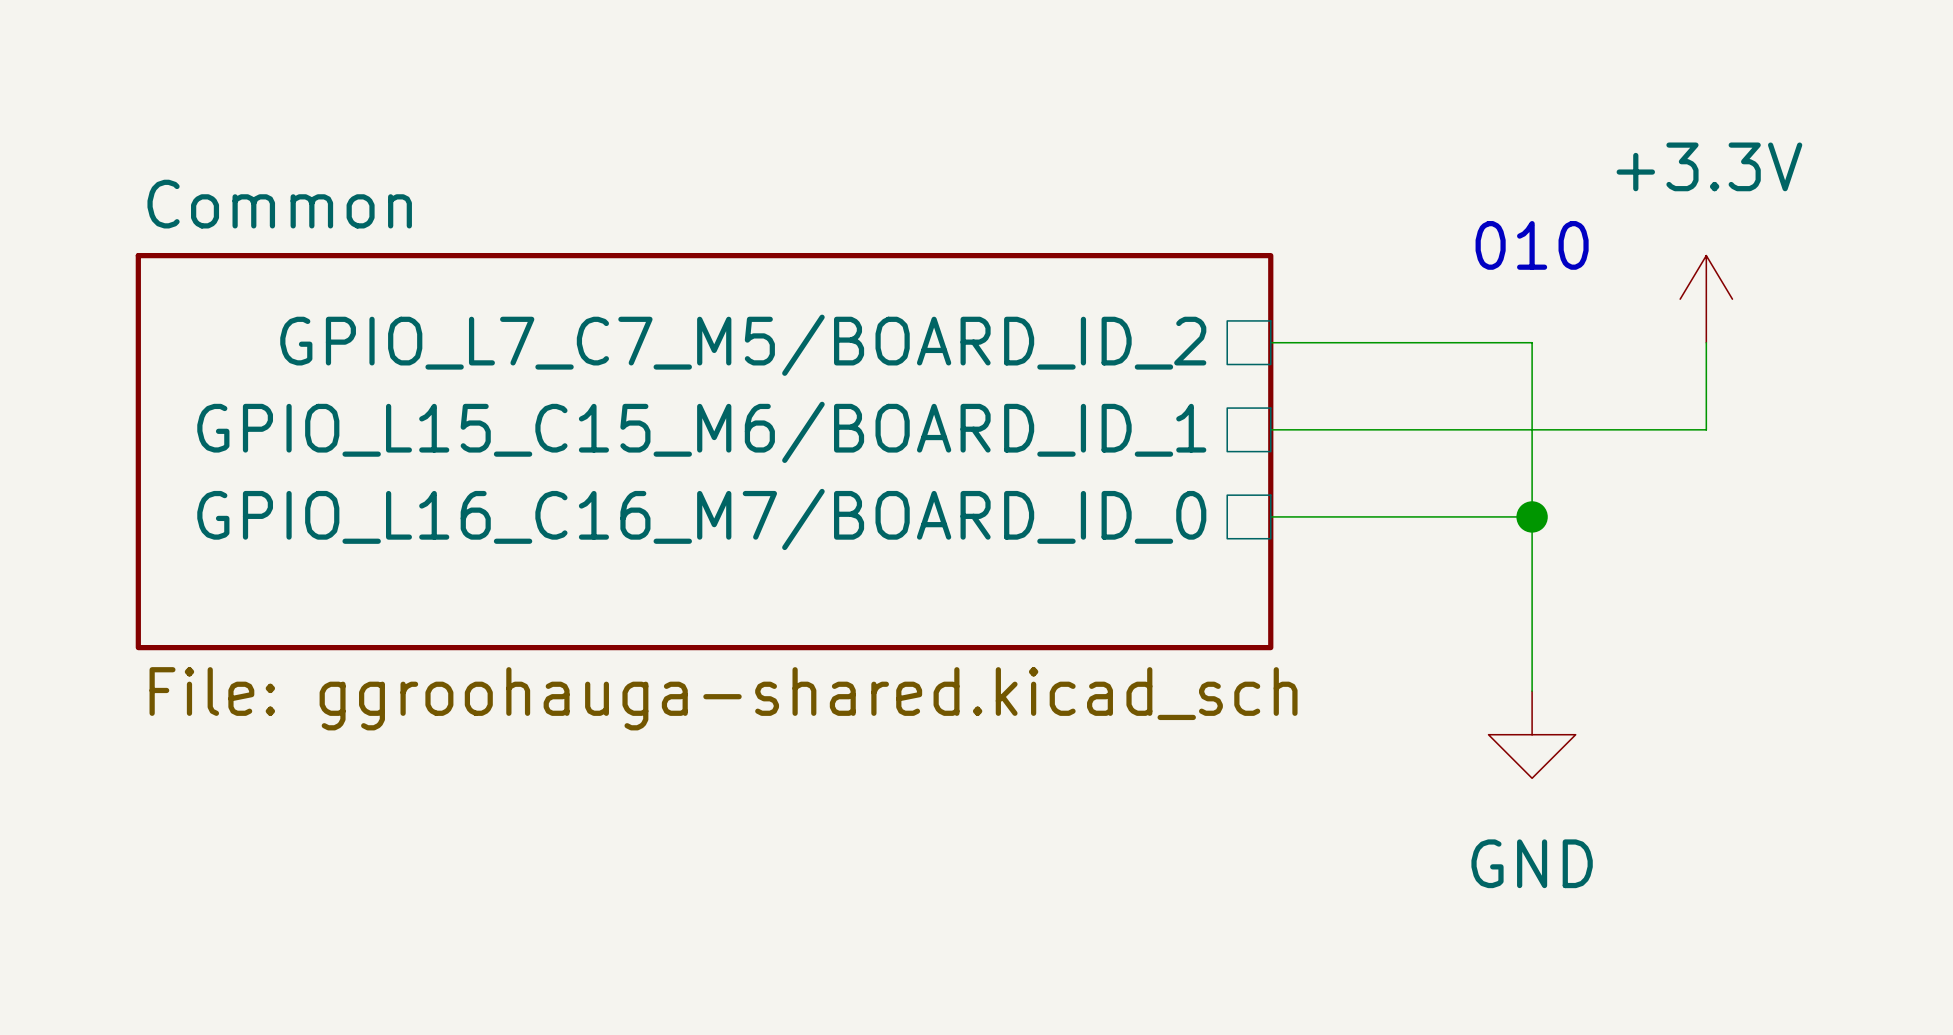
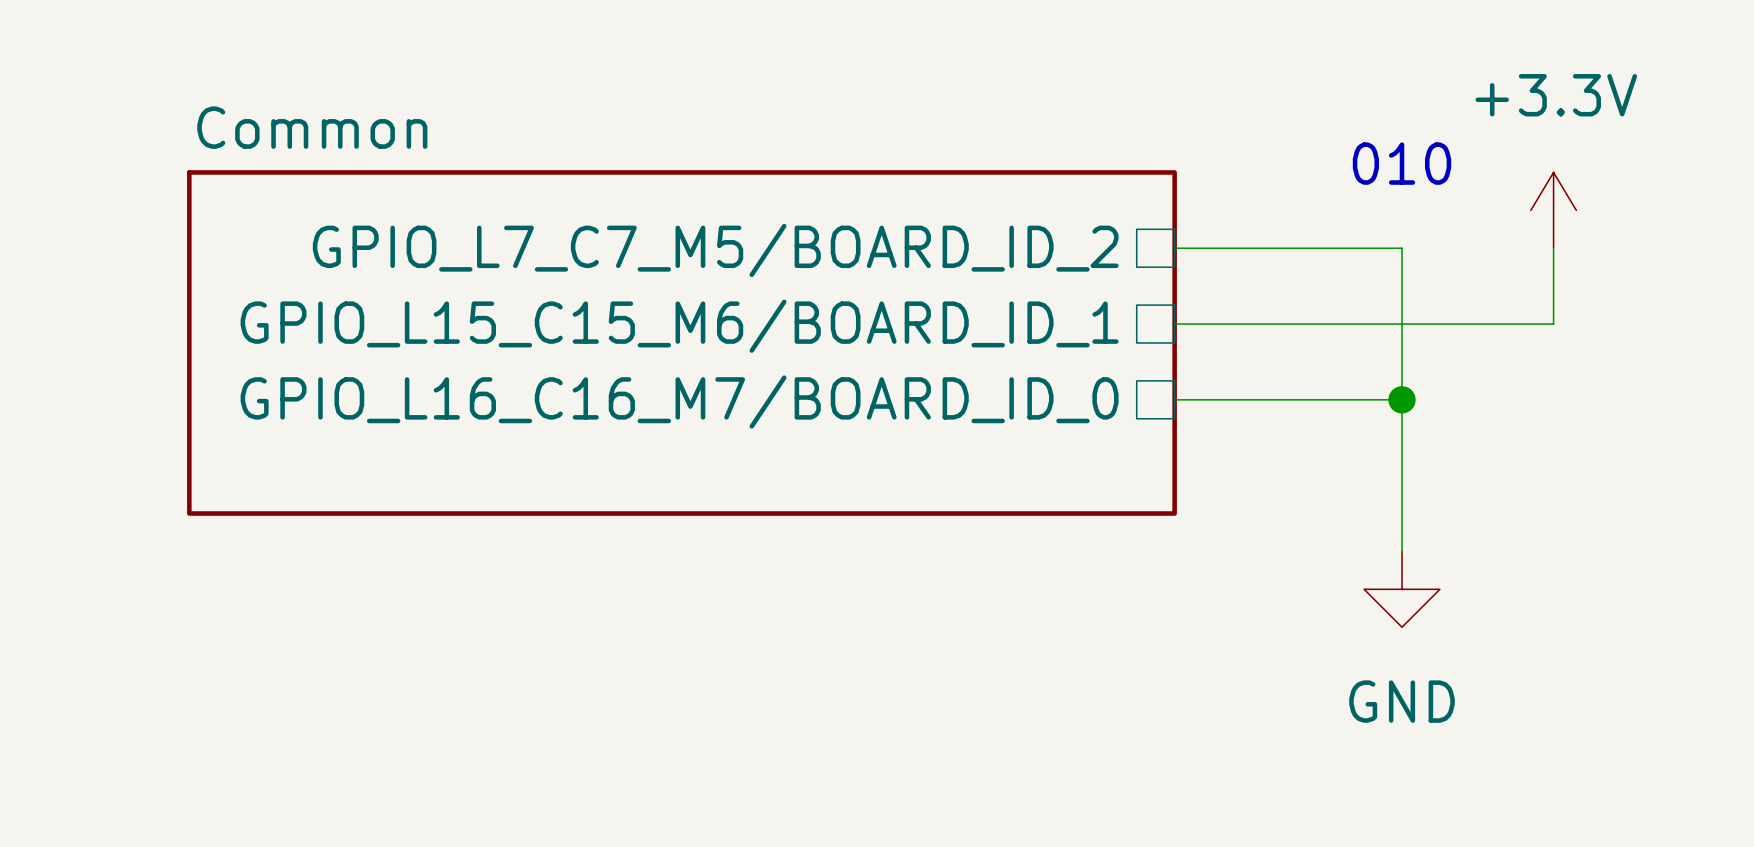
sheet Common value: File: ggroohauga-shared.kicad_sch (723, 698) -> none

